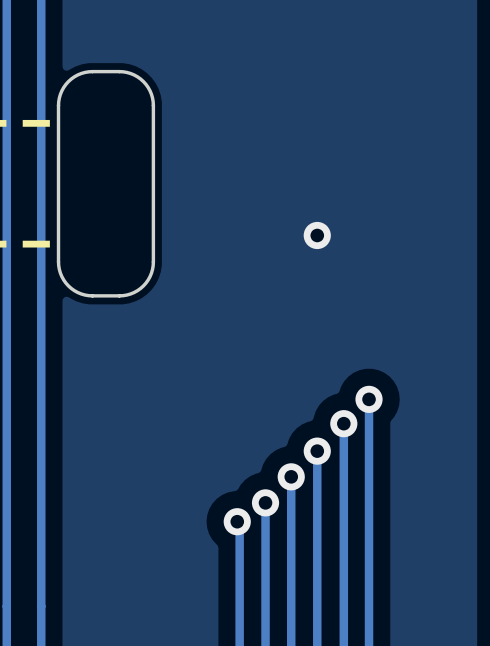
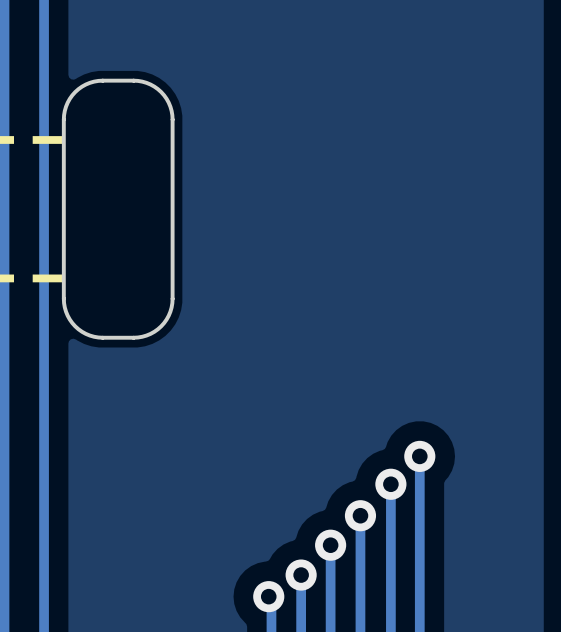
line: none -> (63, 139) (53, 139)
via: (317, 235) -> none
line: none -> (63, 278) (53, 278)

